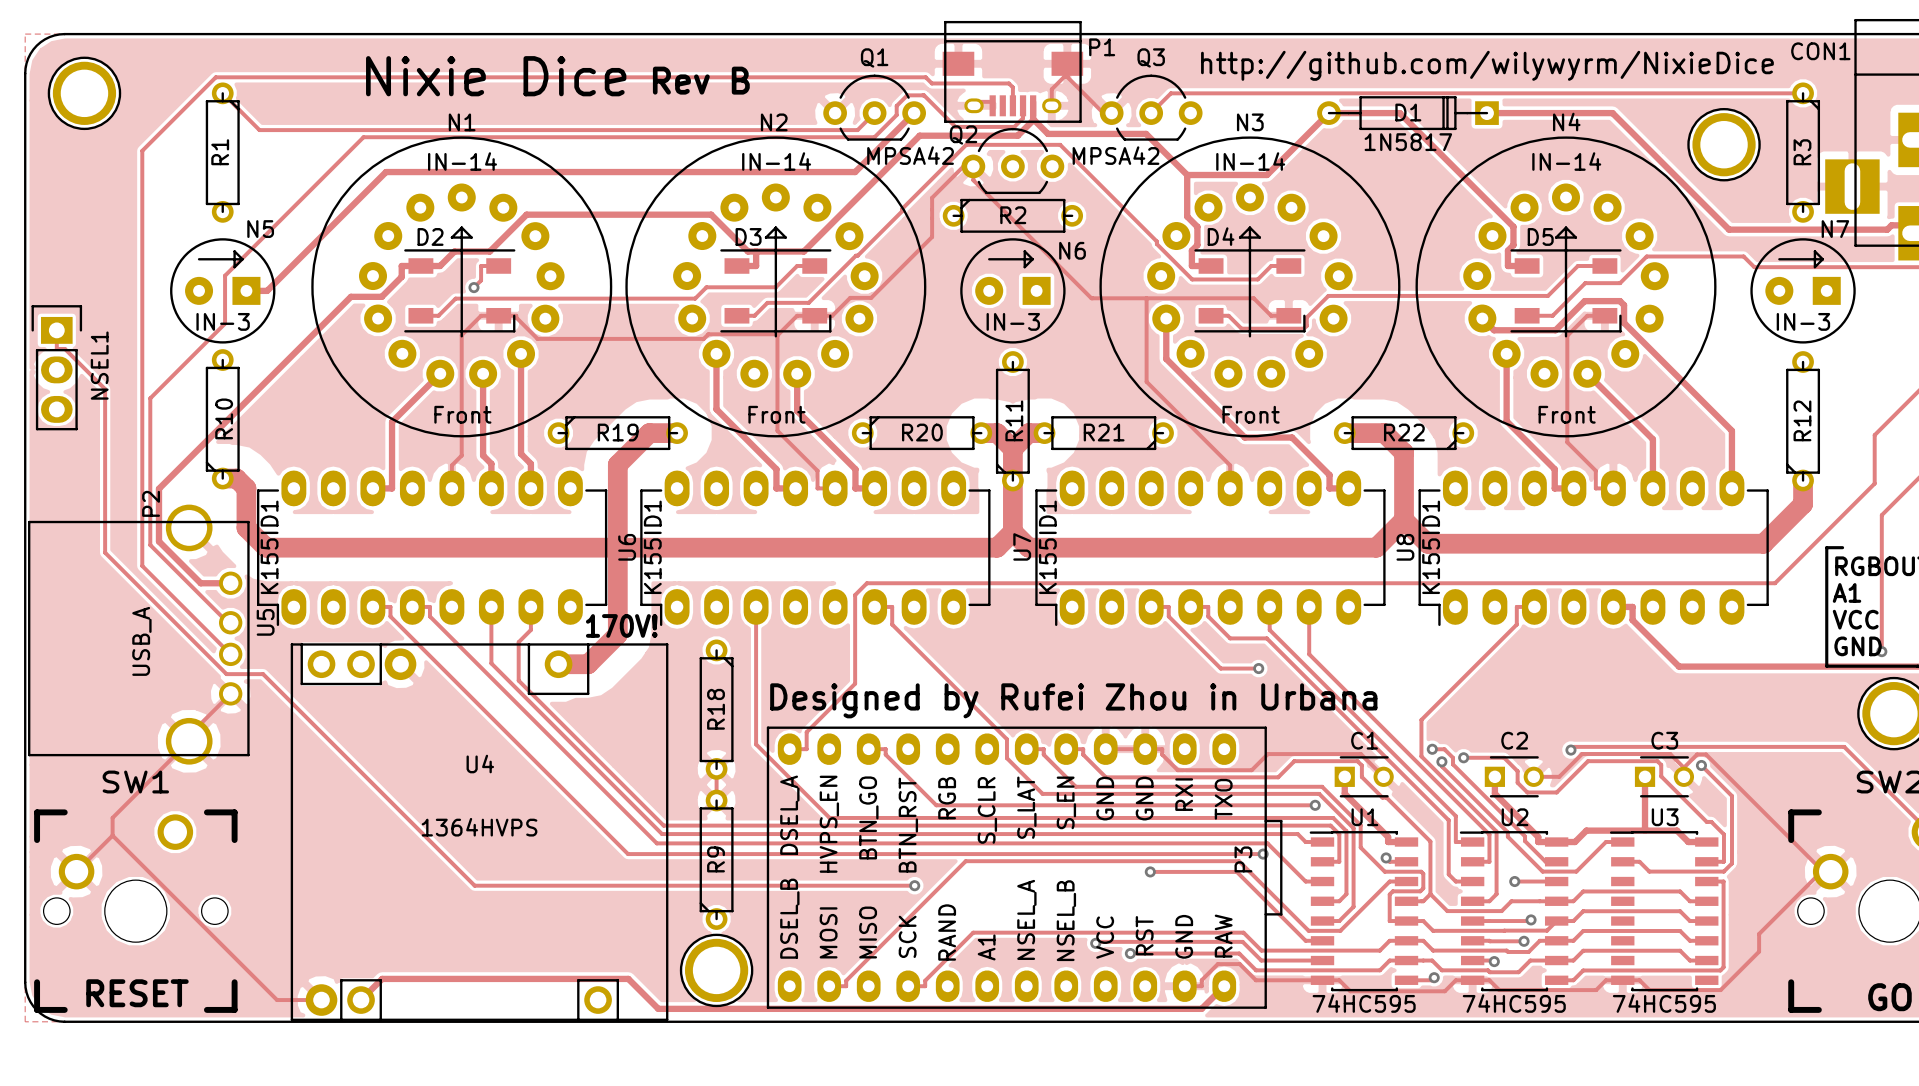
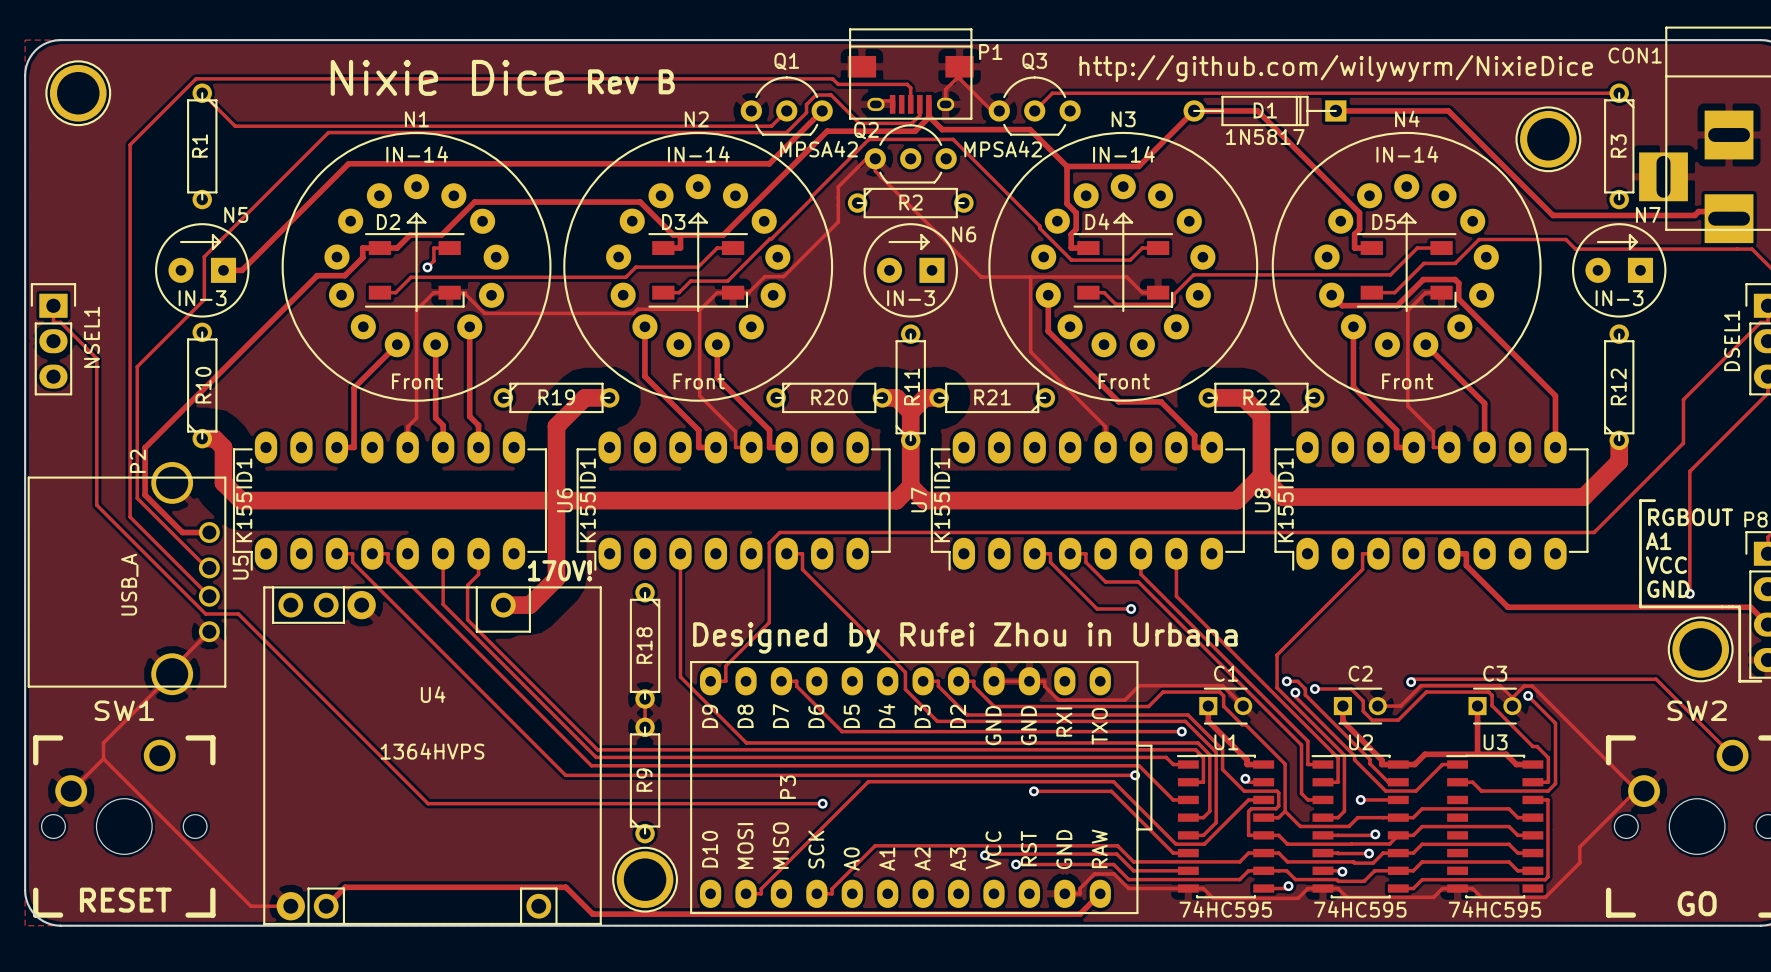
P3 footprint: [766, 726, 1283, 1009] -> [690, 660, 1153, 915]
P3 name position: P3 (1243, 859) -> P3 (788, 787)

